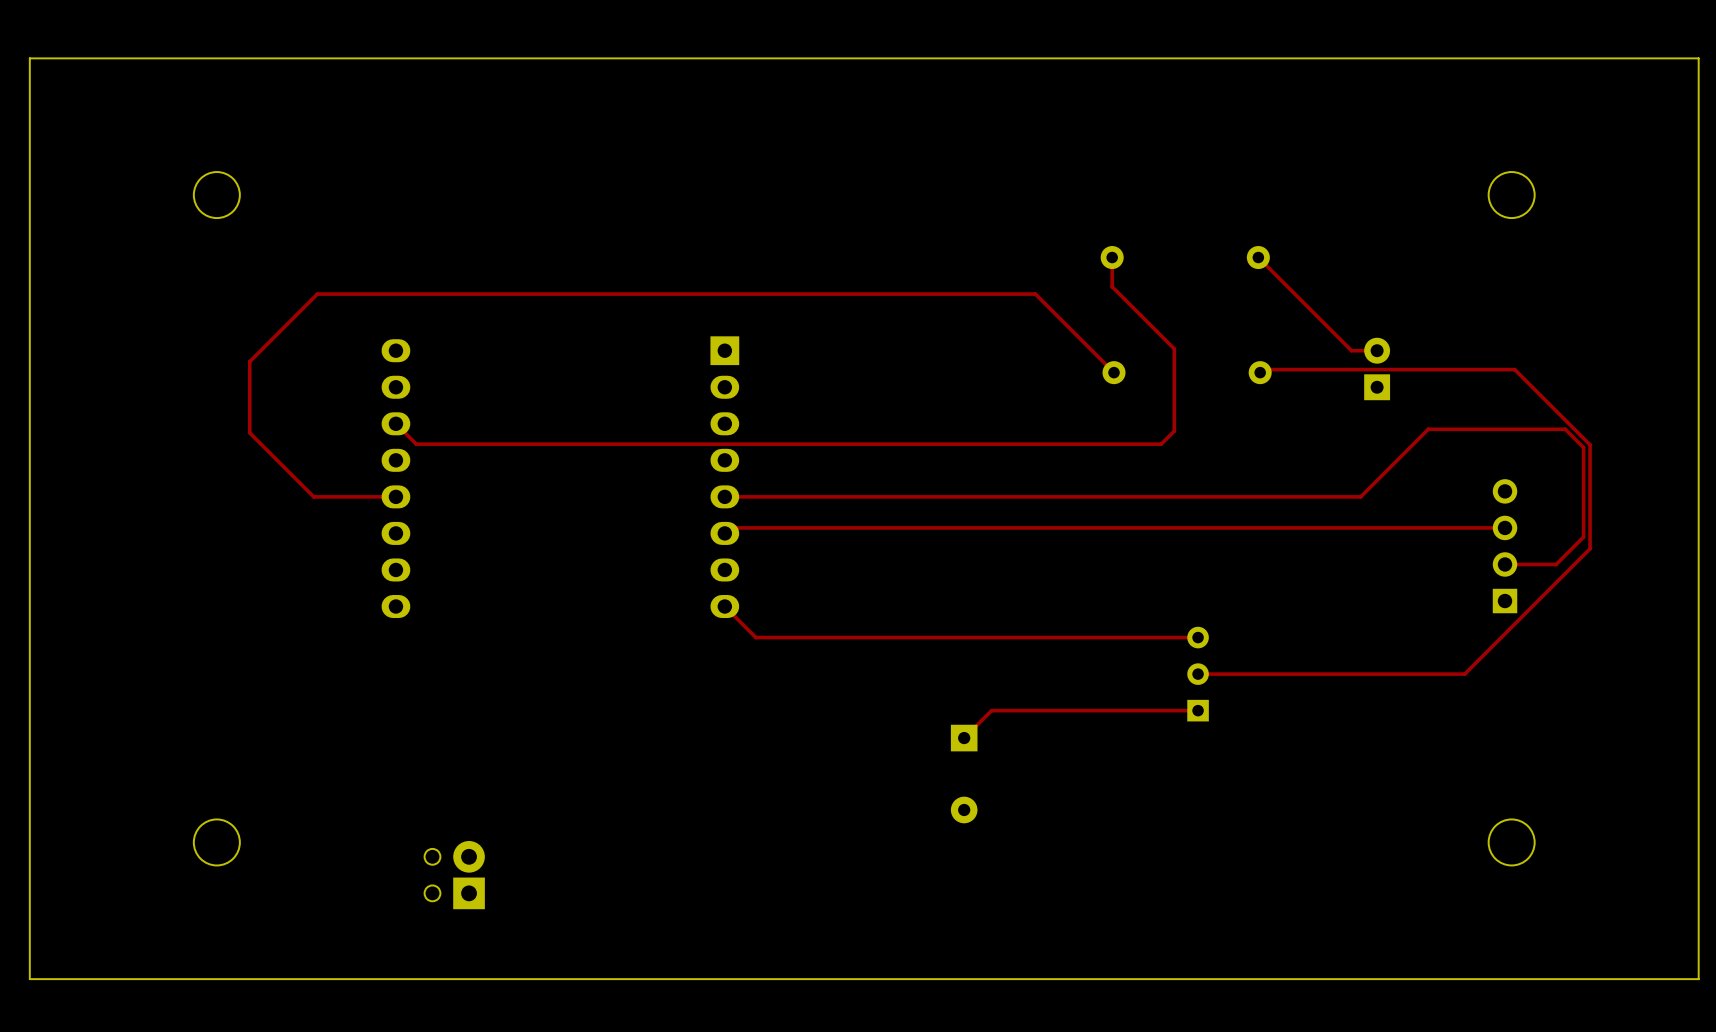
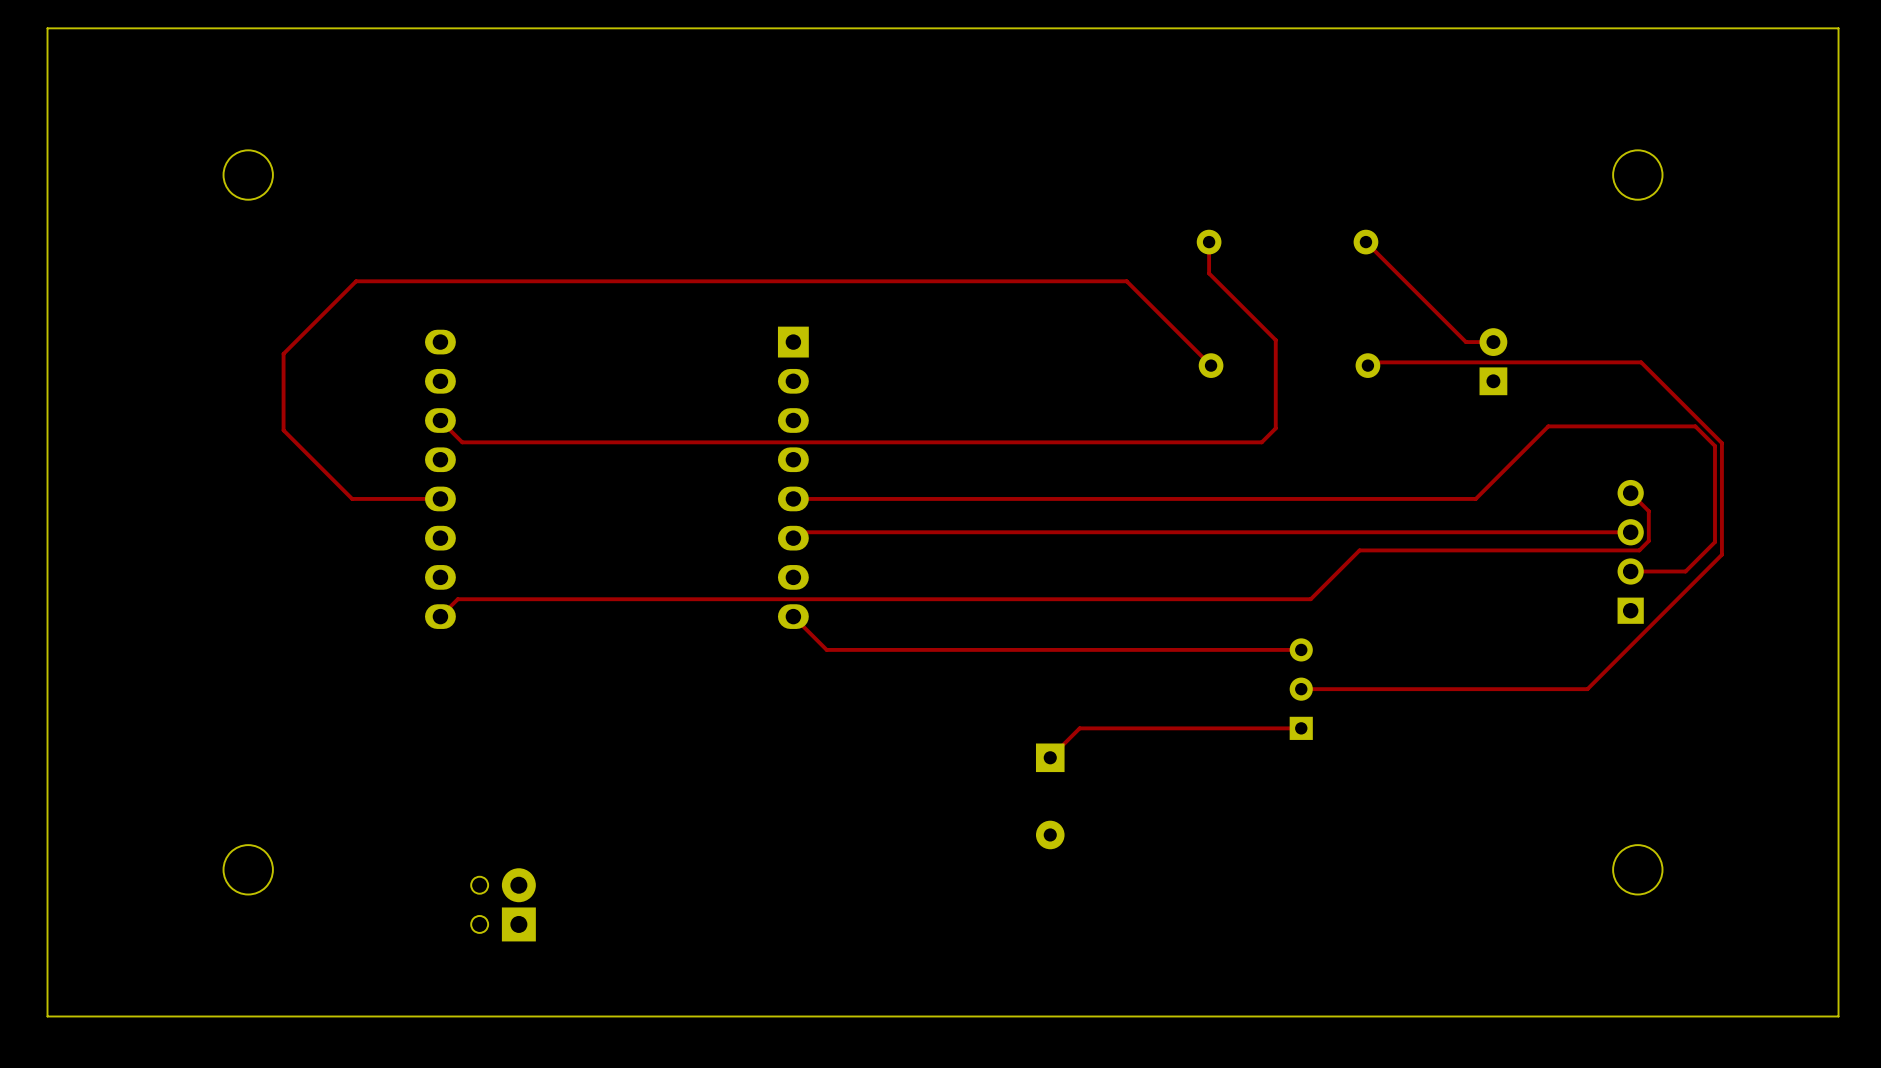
top track: none -> (1630, 493) (1648, 511) (1648, 540) (1639, 550) (1359, 550) (1310, 599) (457, 599) (440, 616)

